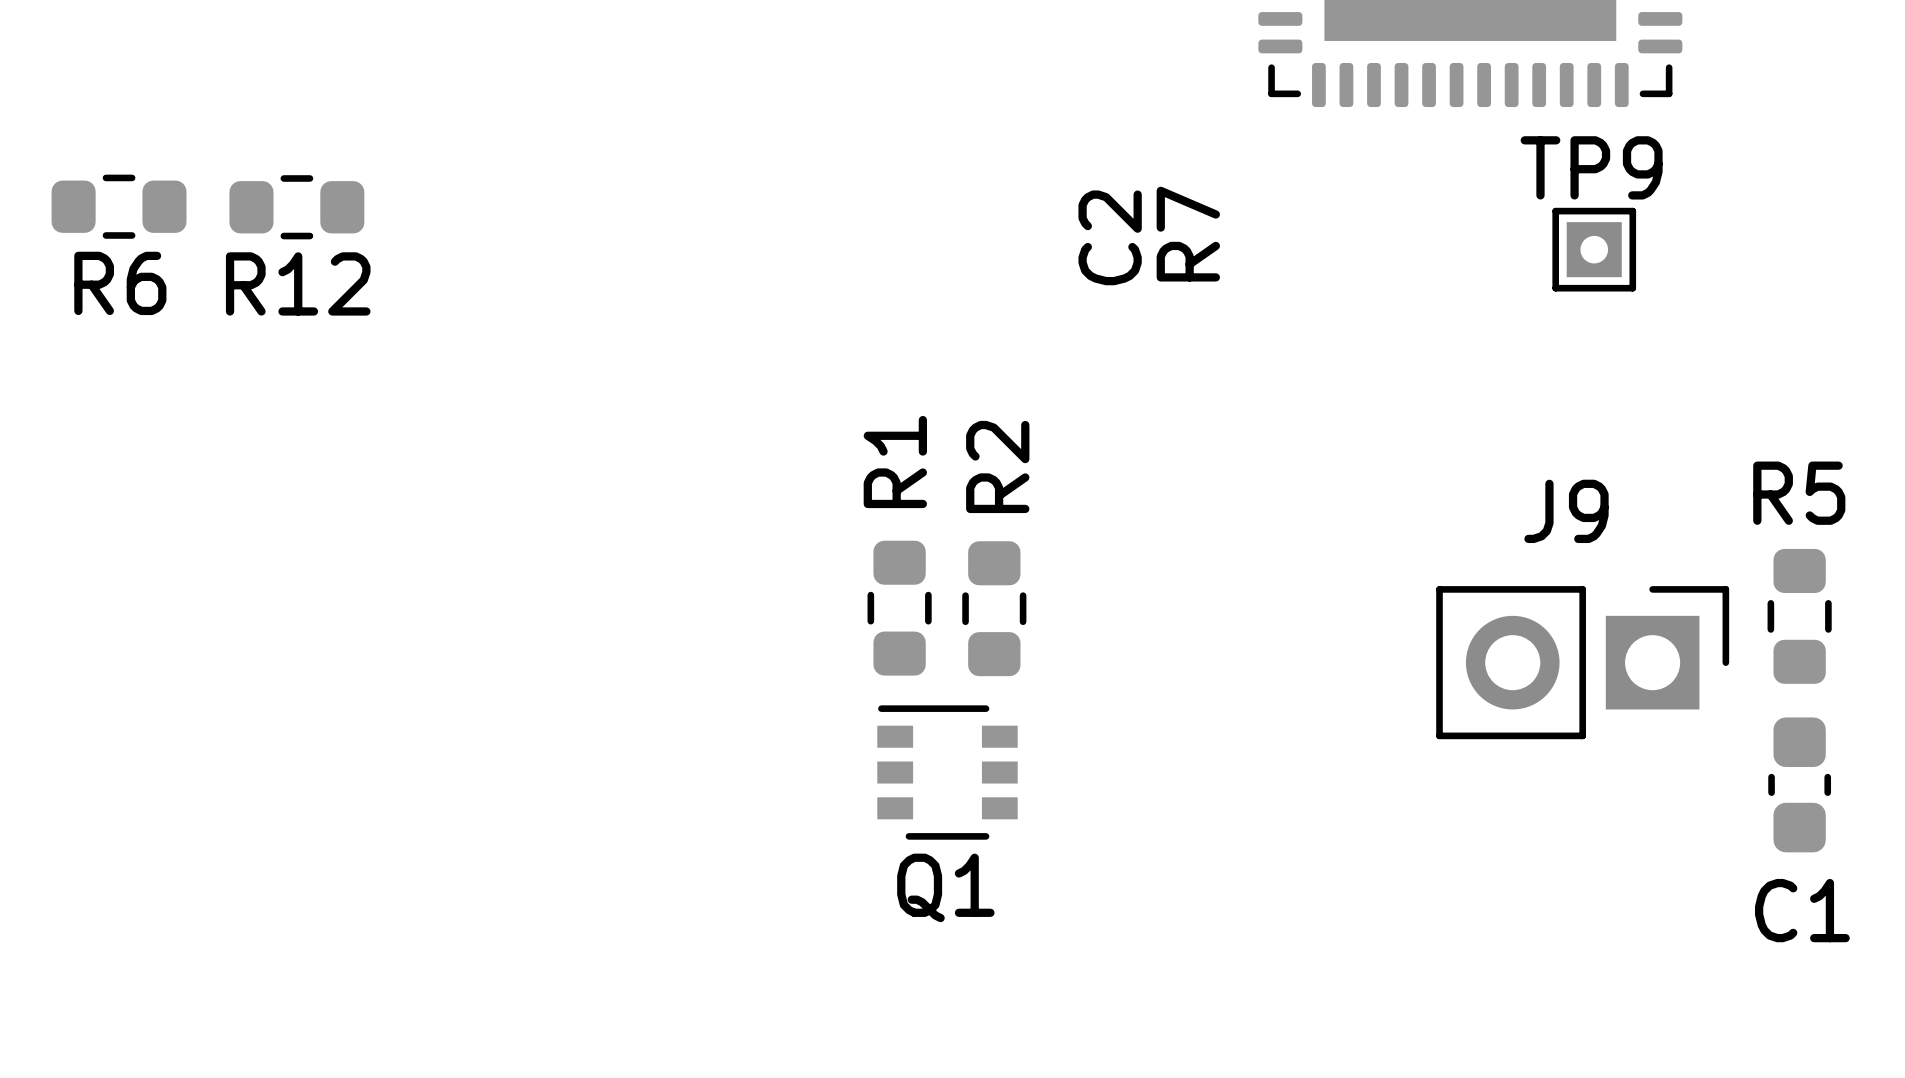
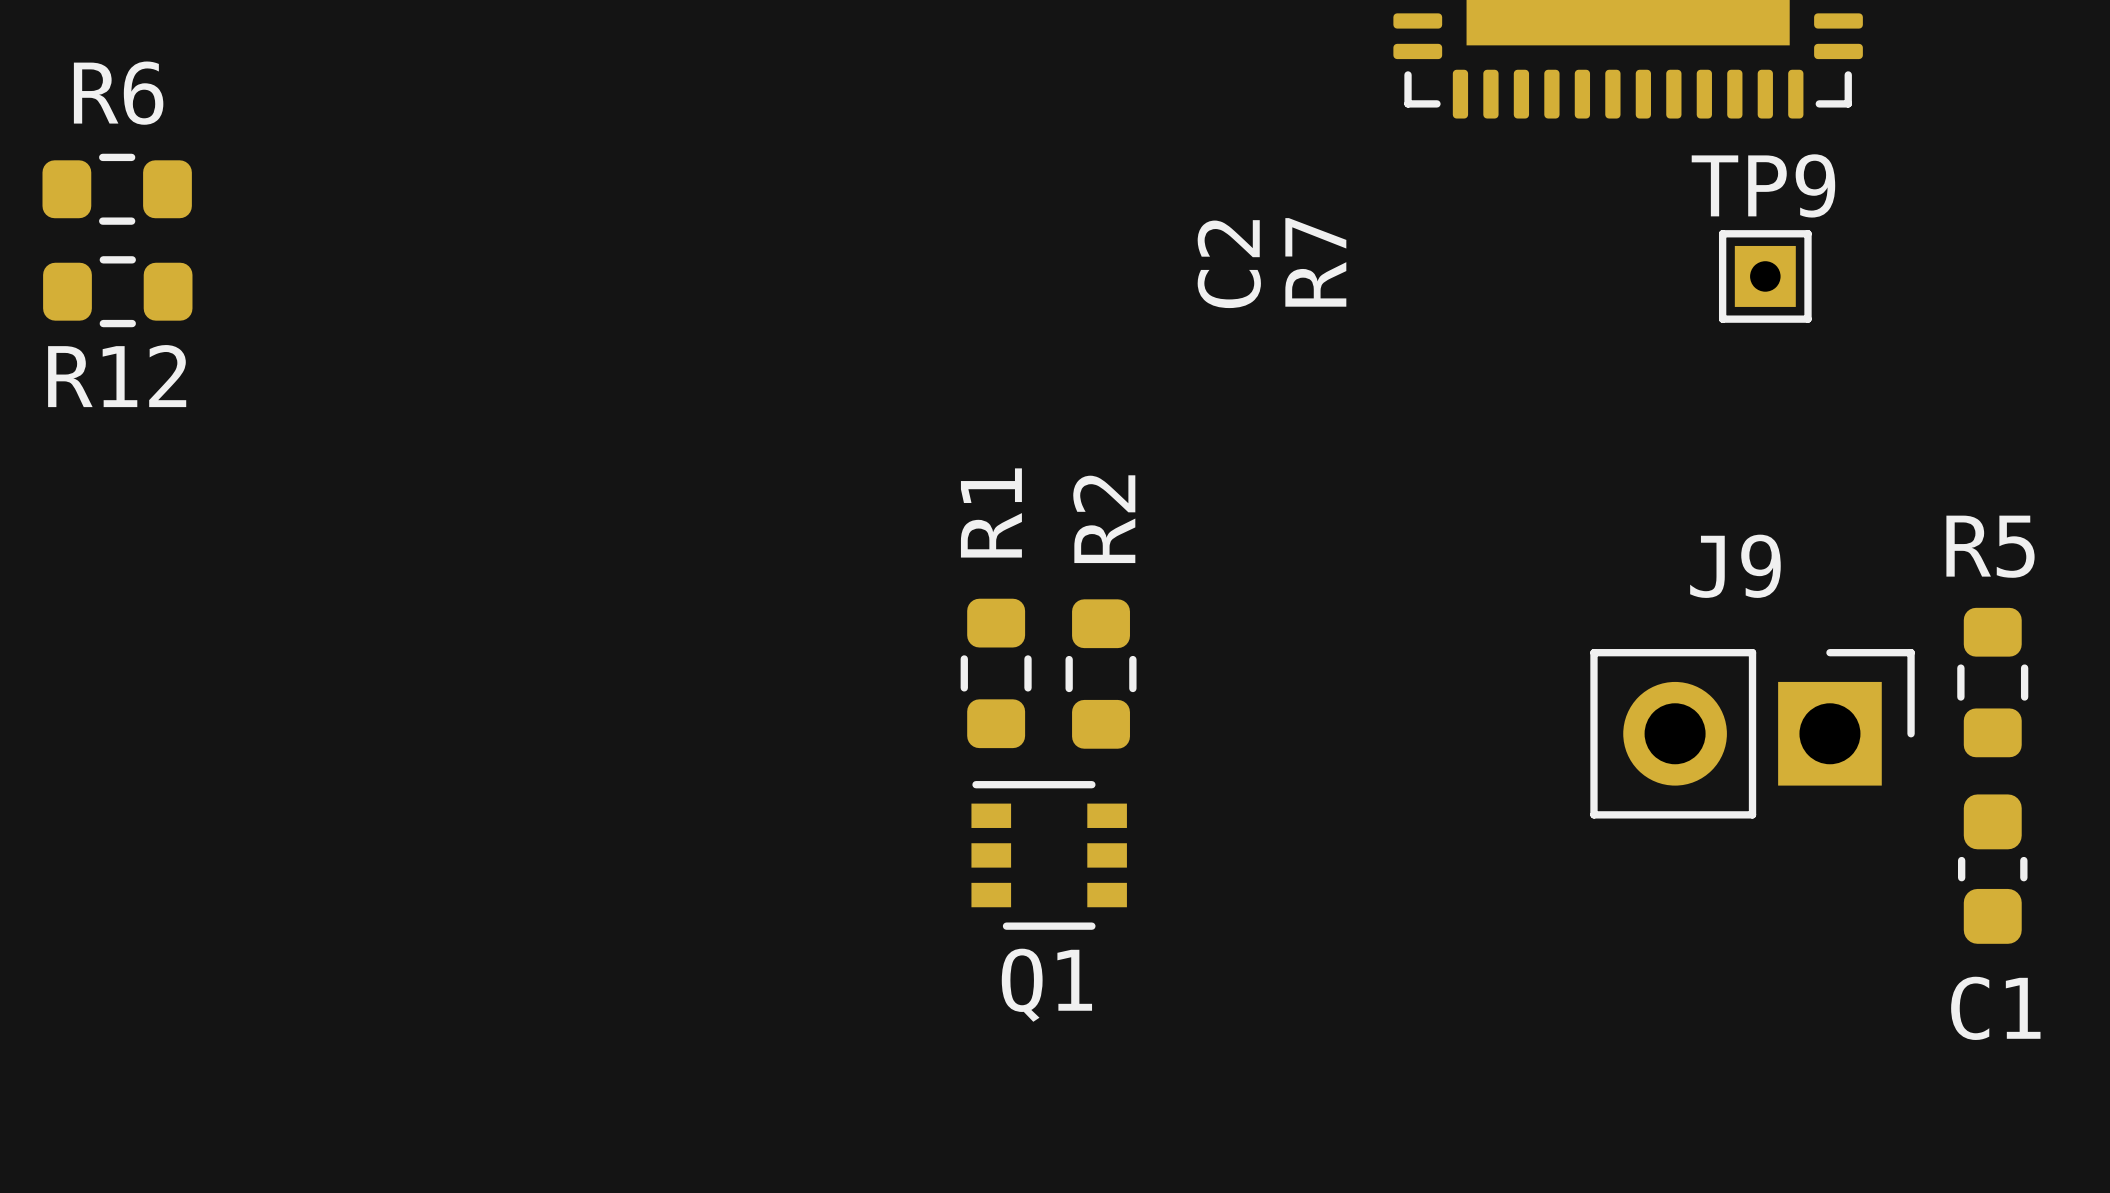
R6 position: (119, 206) -> (117, 189)
R12 position: (296, 207) -> (117, 291)
R6 name position: R6 (120, 283) -> R6 (118, 93)

